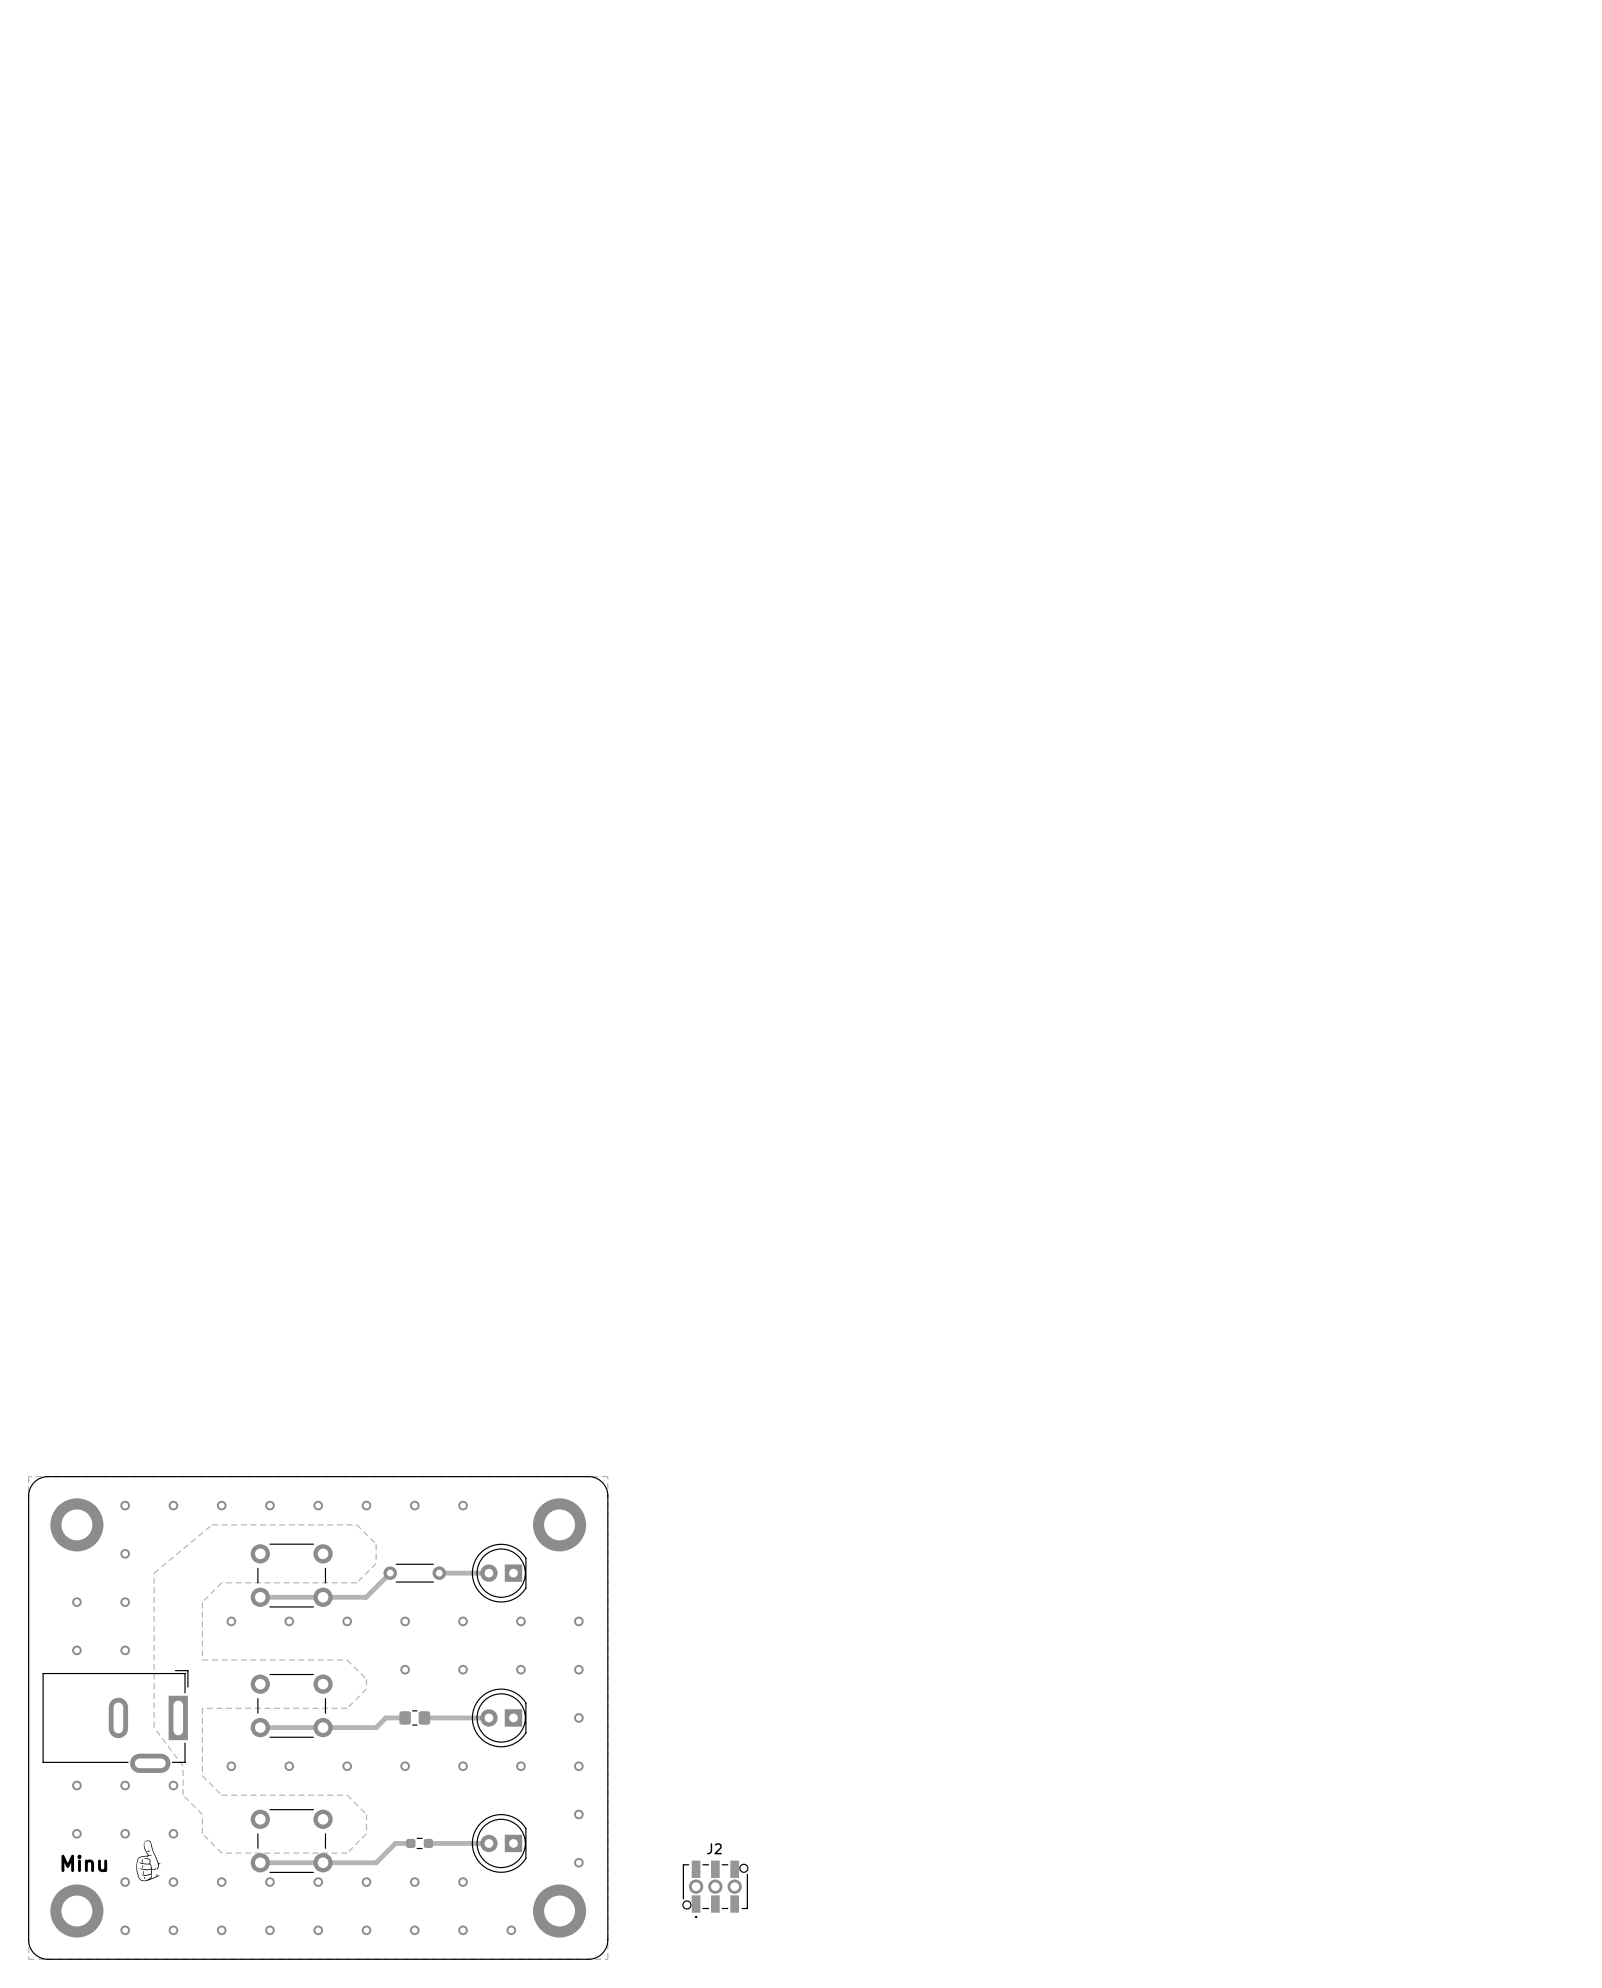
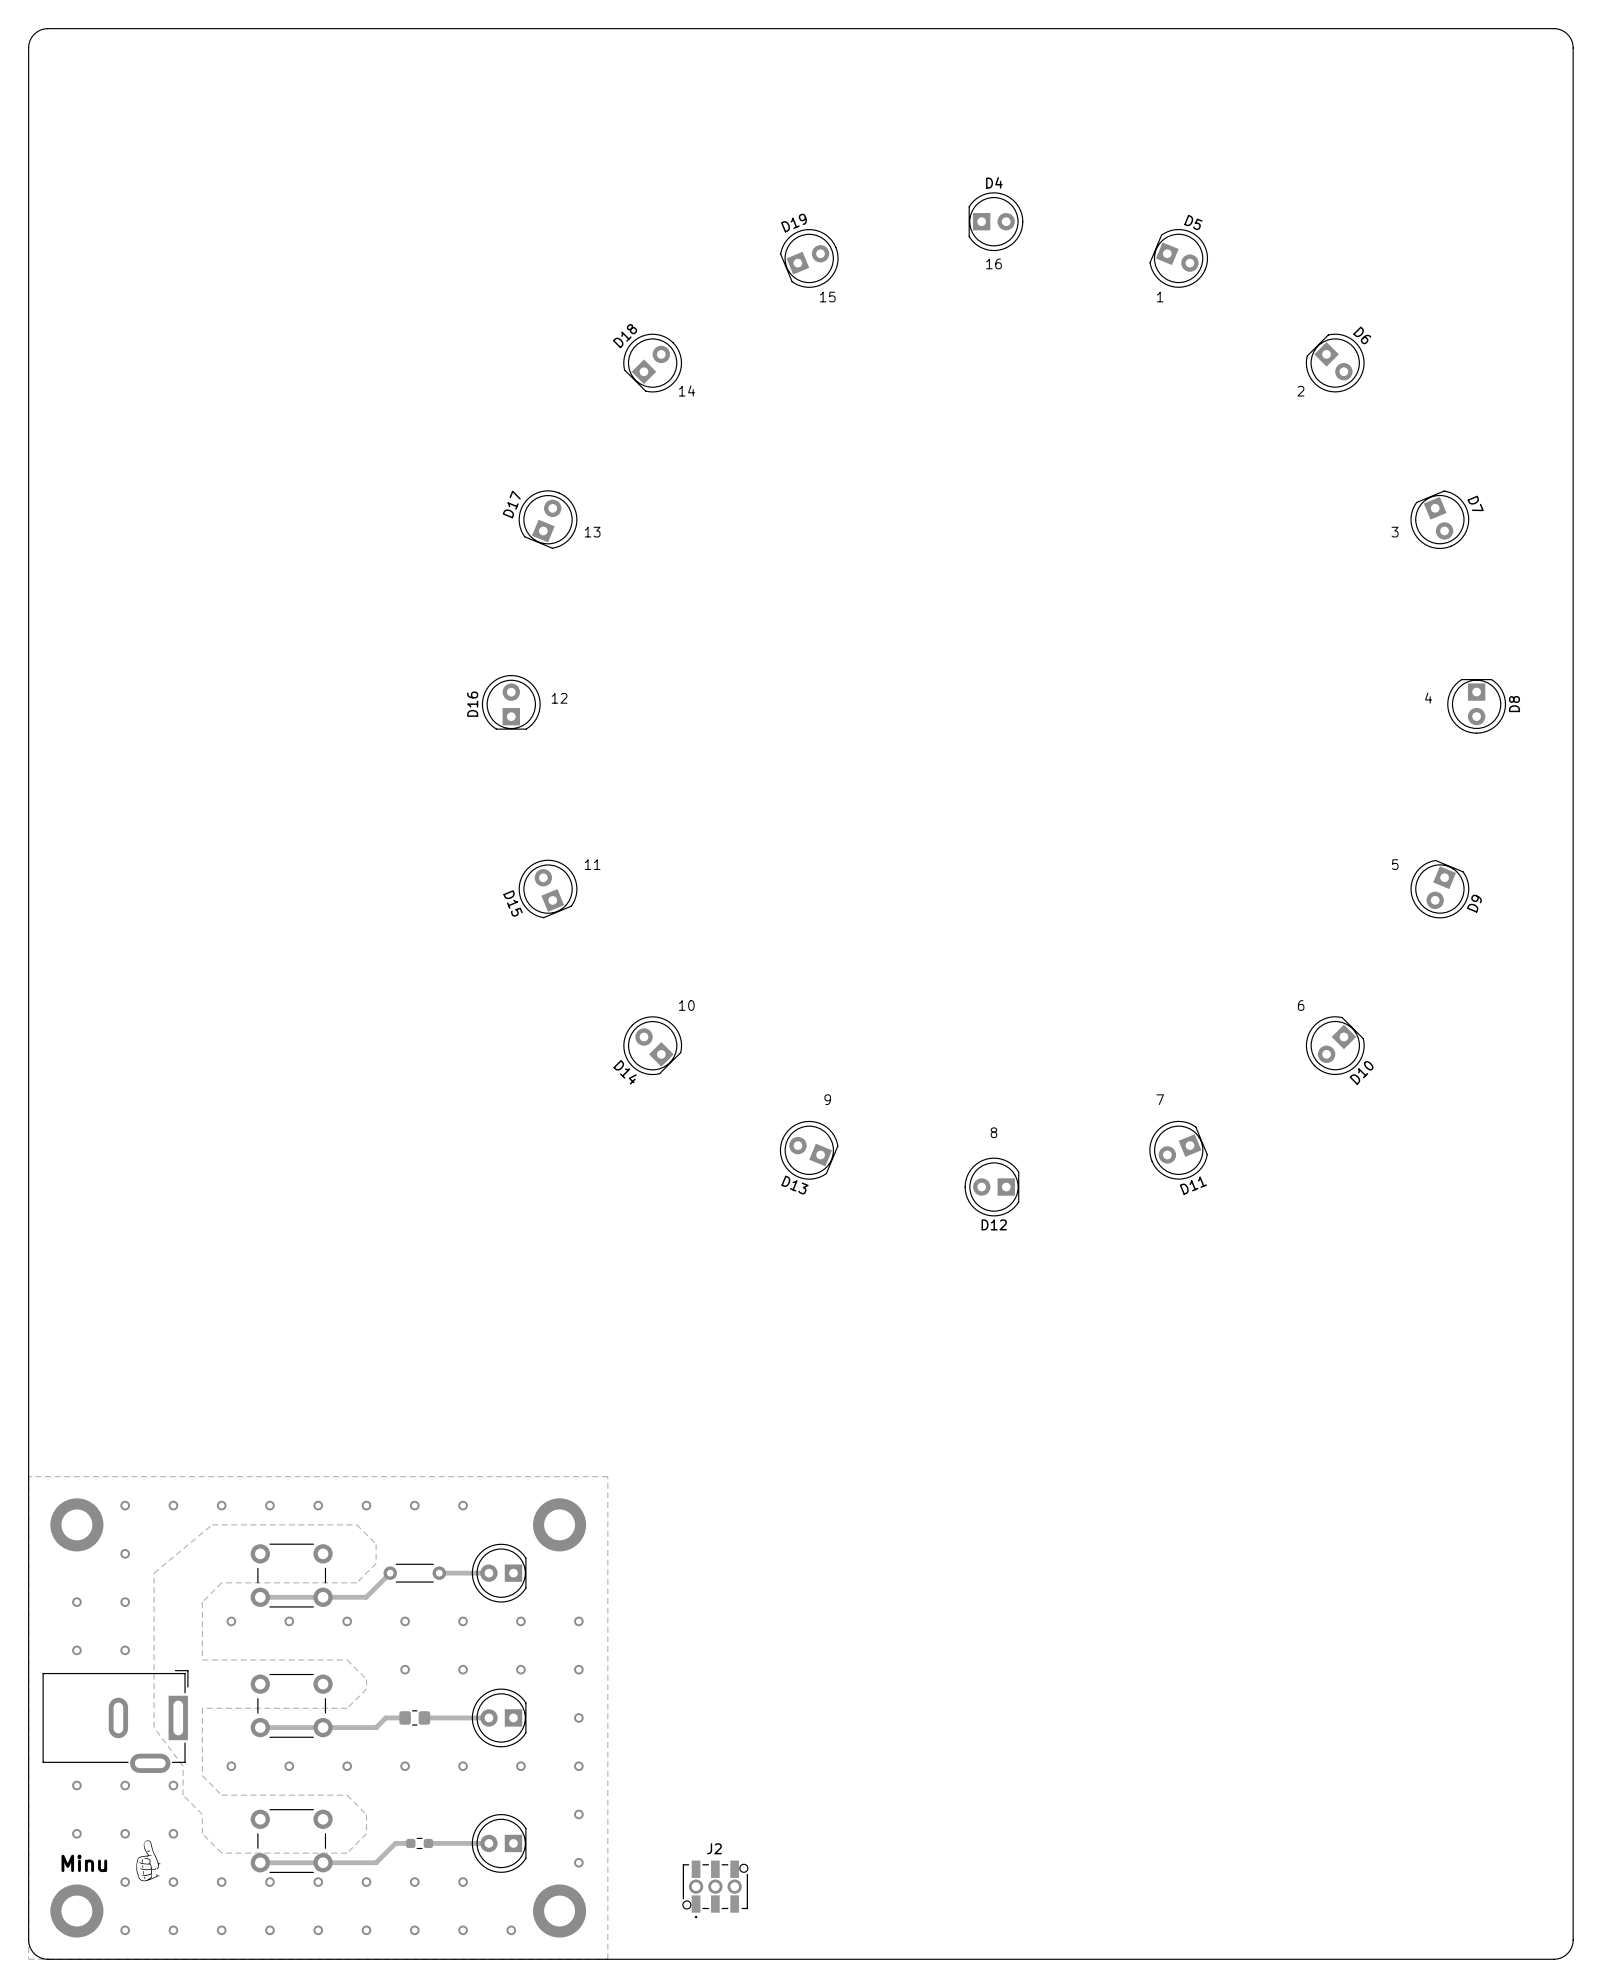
D4: none -> (995, 221)
D19: none -> (809, 258)
D5: none -> (1178, 258)
text: none -> 16 (993, 263)
text: none -> 15 (827, 297)
text: none -> 1 (1160, 297)
D18: none -> (652, 363)
D6: none -> (1335, 363)
text: none -> 14 (687, 390)
text: none -> 2 (1300, 391)
D17: none -> (548, 519)
D7: none -> (1439, 519)
text: none -> 13 (592, 532)
text: none -> 3 (1395, 532)
text: none -> 12 (559, 698)
text: none -> 4 (1428, 698)
D16: none -> (511, 702)
D8: none -> (1476, 706)
text: none -> 11 (592, 864)
text: none -> 5 (1395, 864)
D15: none -> (548, 888)
D9: none -> (1439, 889)
text: none -> 10 (686, 1005)
text: none -> 6 (1301, 1005)
D14: none -> (652, 1045)
D10: none -> (1335, 1045)
text: none -> 9 (827, 1099)
text: none -> 7 (1160, 1099)
text: none -> 8 (993, 1132)
D13: none -> (809, 1150)
D11: none -> (1178, 1150)
D12: none -> (991, 1187)
board edge: (28, 1495) (34, 1482) (47, 1476) (588, 1476) (600, 1480) (605, 1487) (607, 1495) (607, 1939) (602, 1953) (588, 1959) -> (28, 1495) (28, 47) (34, 34) (47, 28) (1553, 28) (1565, 32) (1571, 39) (1573, 47) (1573, 1939) (1571, 1948) (1564, 1956) (1553, 1959) (588, 1959)

